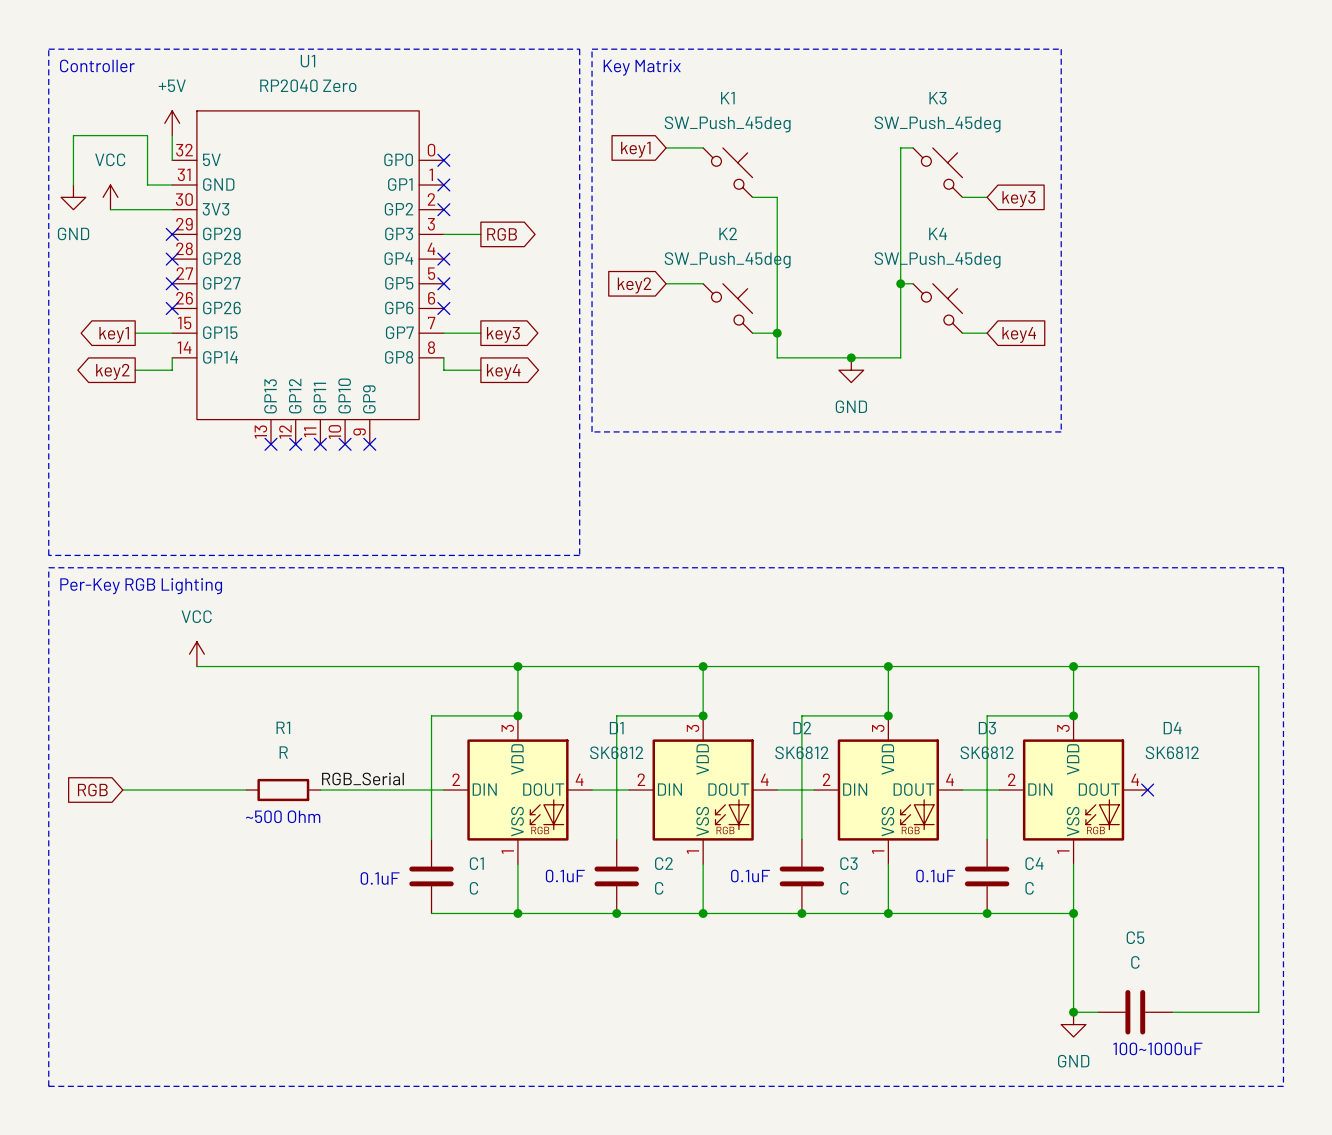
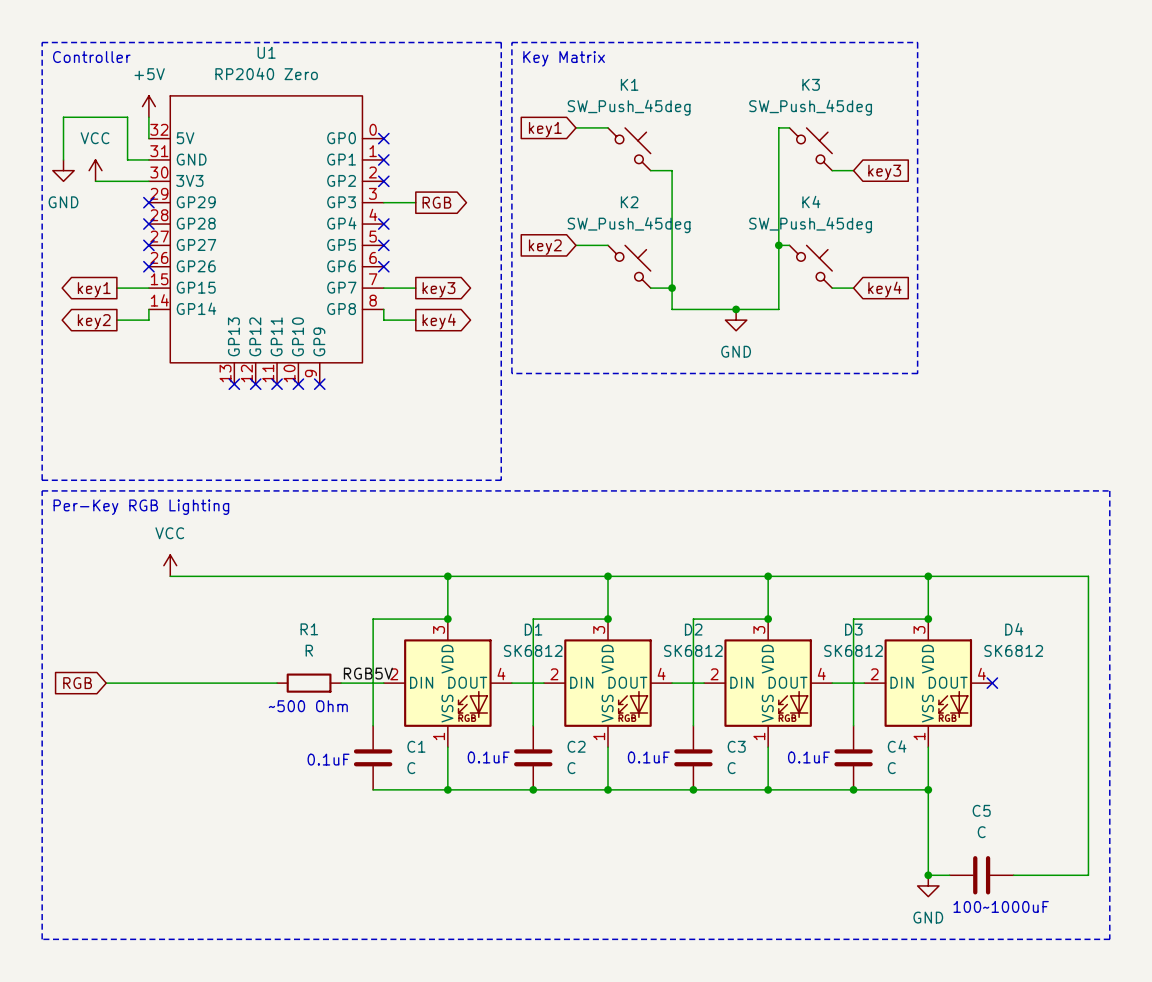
label: RGB_Serial (362, 778) -> none
label: none -> RGB5V (368, 673)
R1 position: (283, 790) -> (309, 683)
wire: (320, 790) (394, 790) -> (277, 683) (212, 683)
text position: ~500 Ohm (283, 816) -> ~500 Ohm (308, 706)

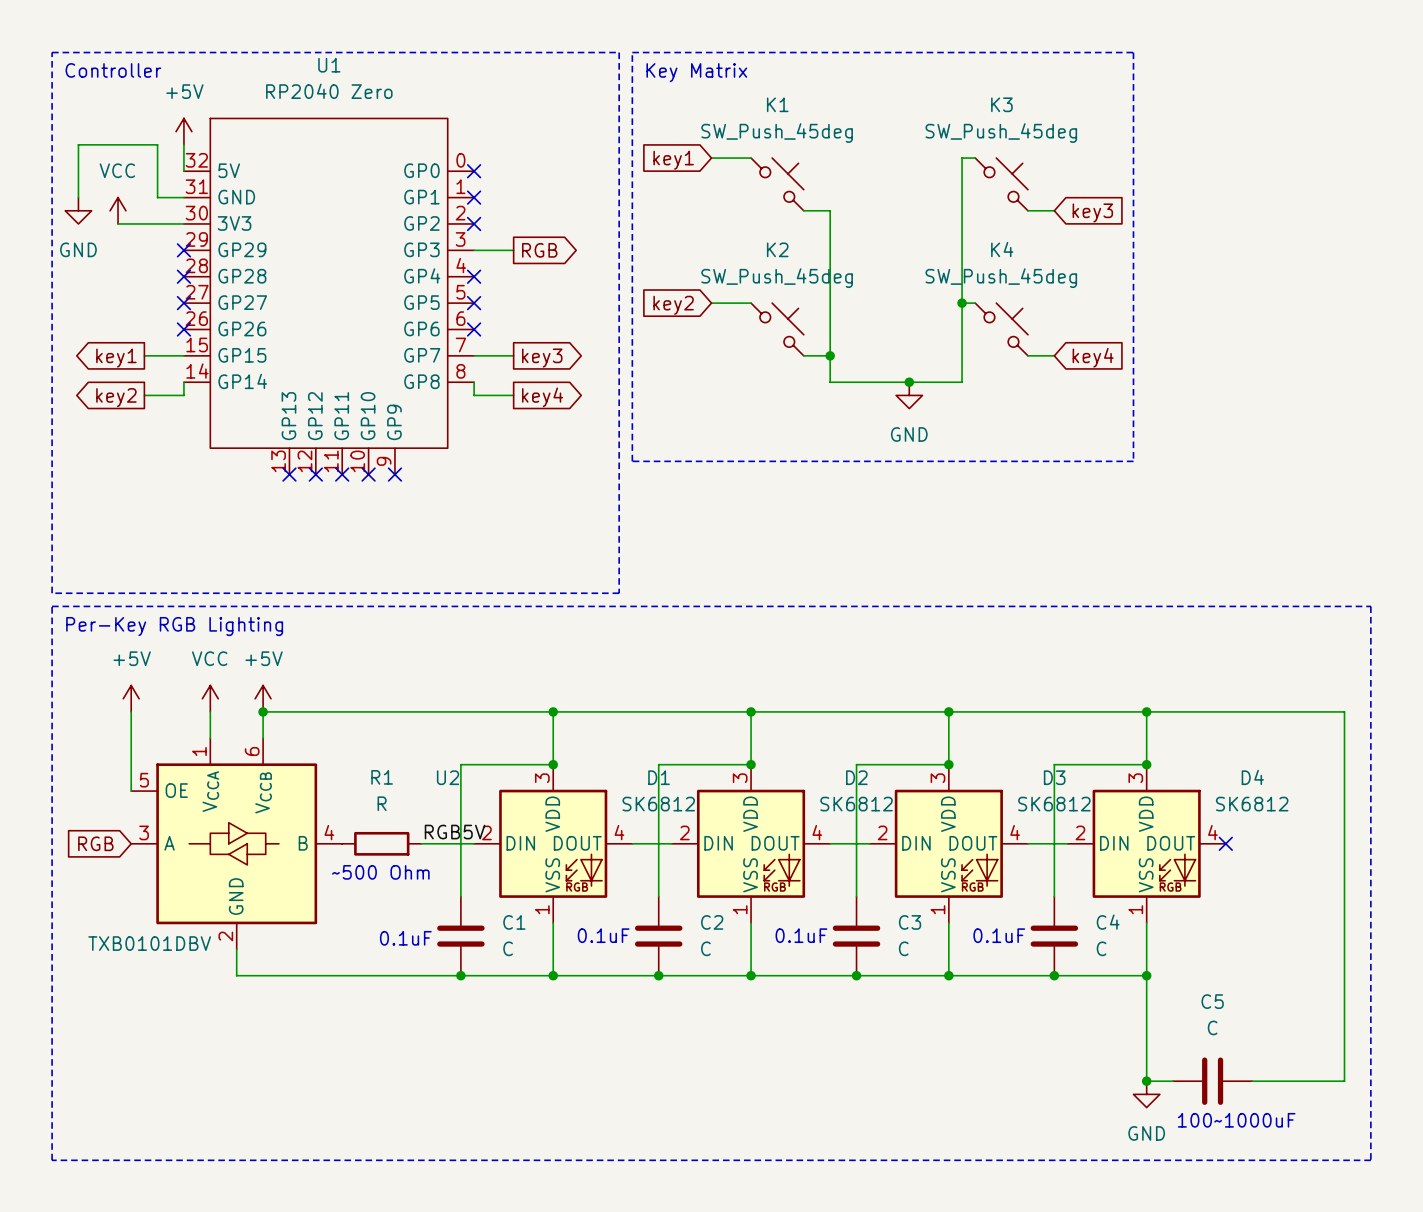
power symbol: none -> +5V (131, 698)
power symbol: none -> +5V (263, 698)
wire: none -> (131, 711) (131, 791)
wire: (170, 576) (212, 576) -> (210, 711) (210, 738)
wire: none -> (263, 711) (263, 738)
junction: none -> (263, 711)
U2: none -> TXB0101DBV (236, 843)
wire: none -> (236, 949) (236, 975) (460, 975)
junction: none -> (460, 975)

